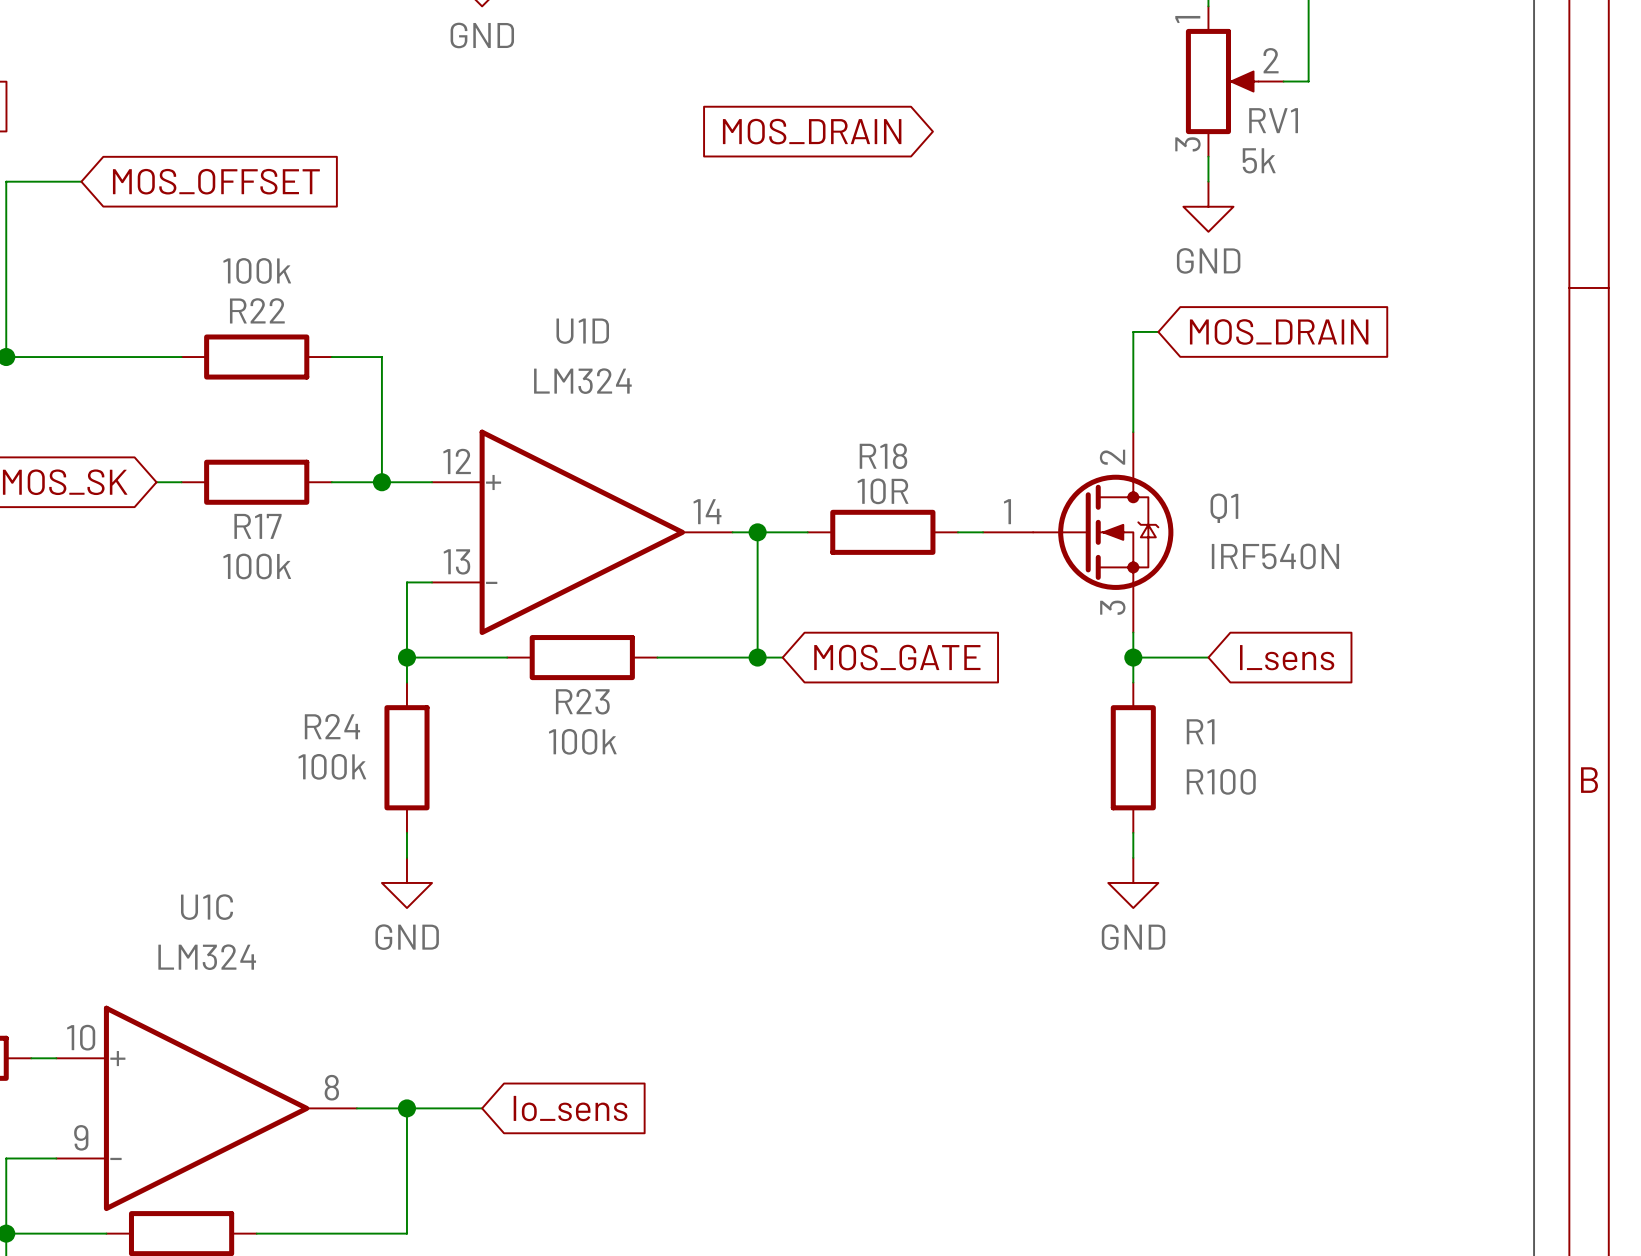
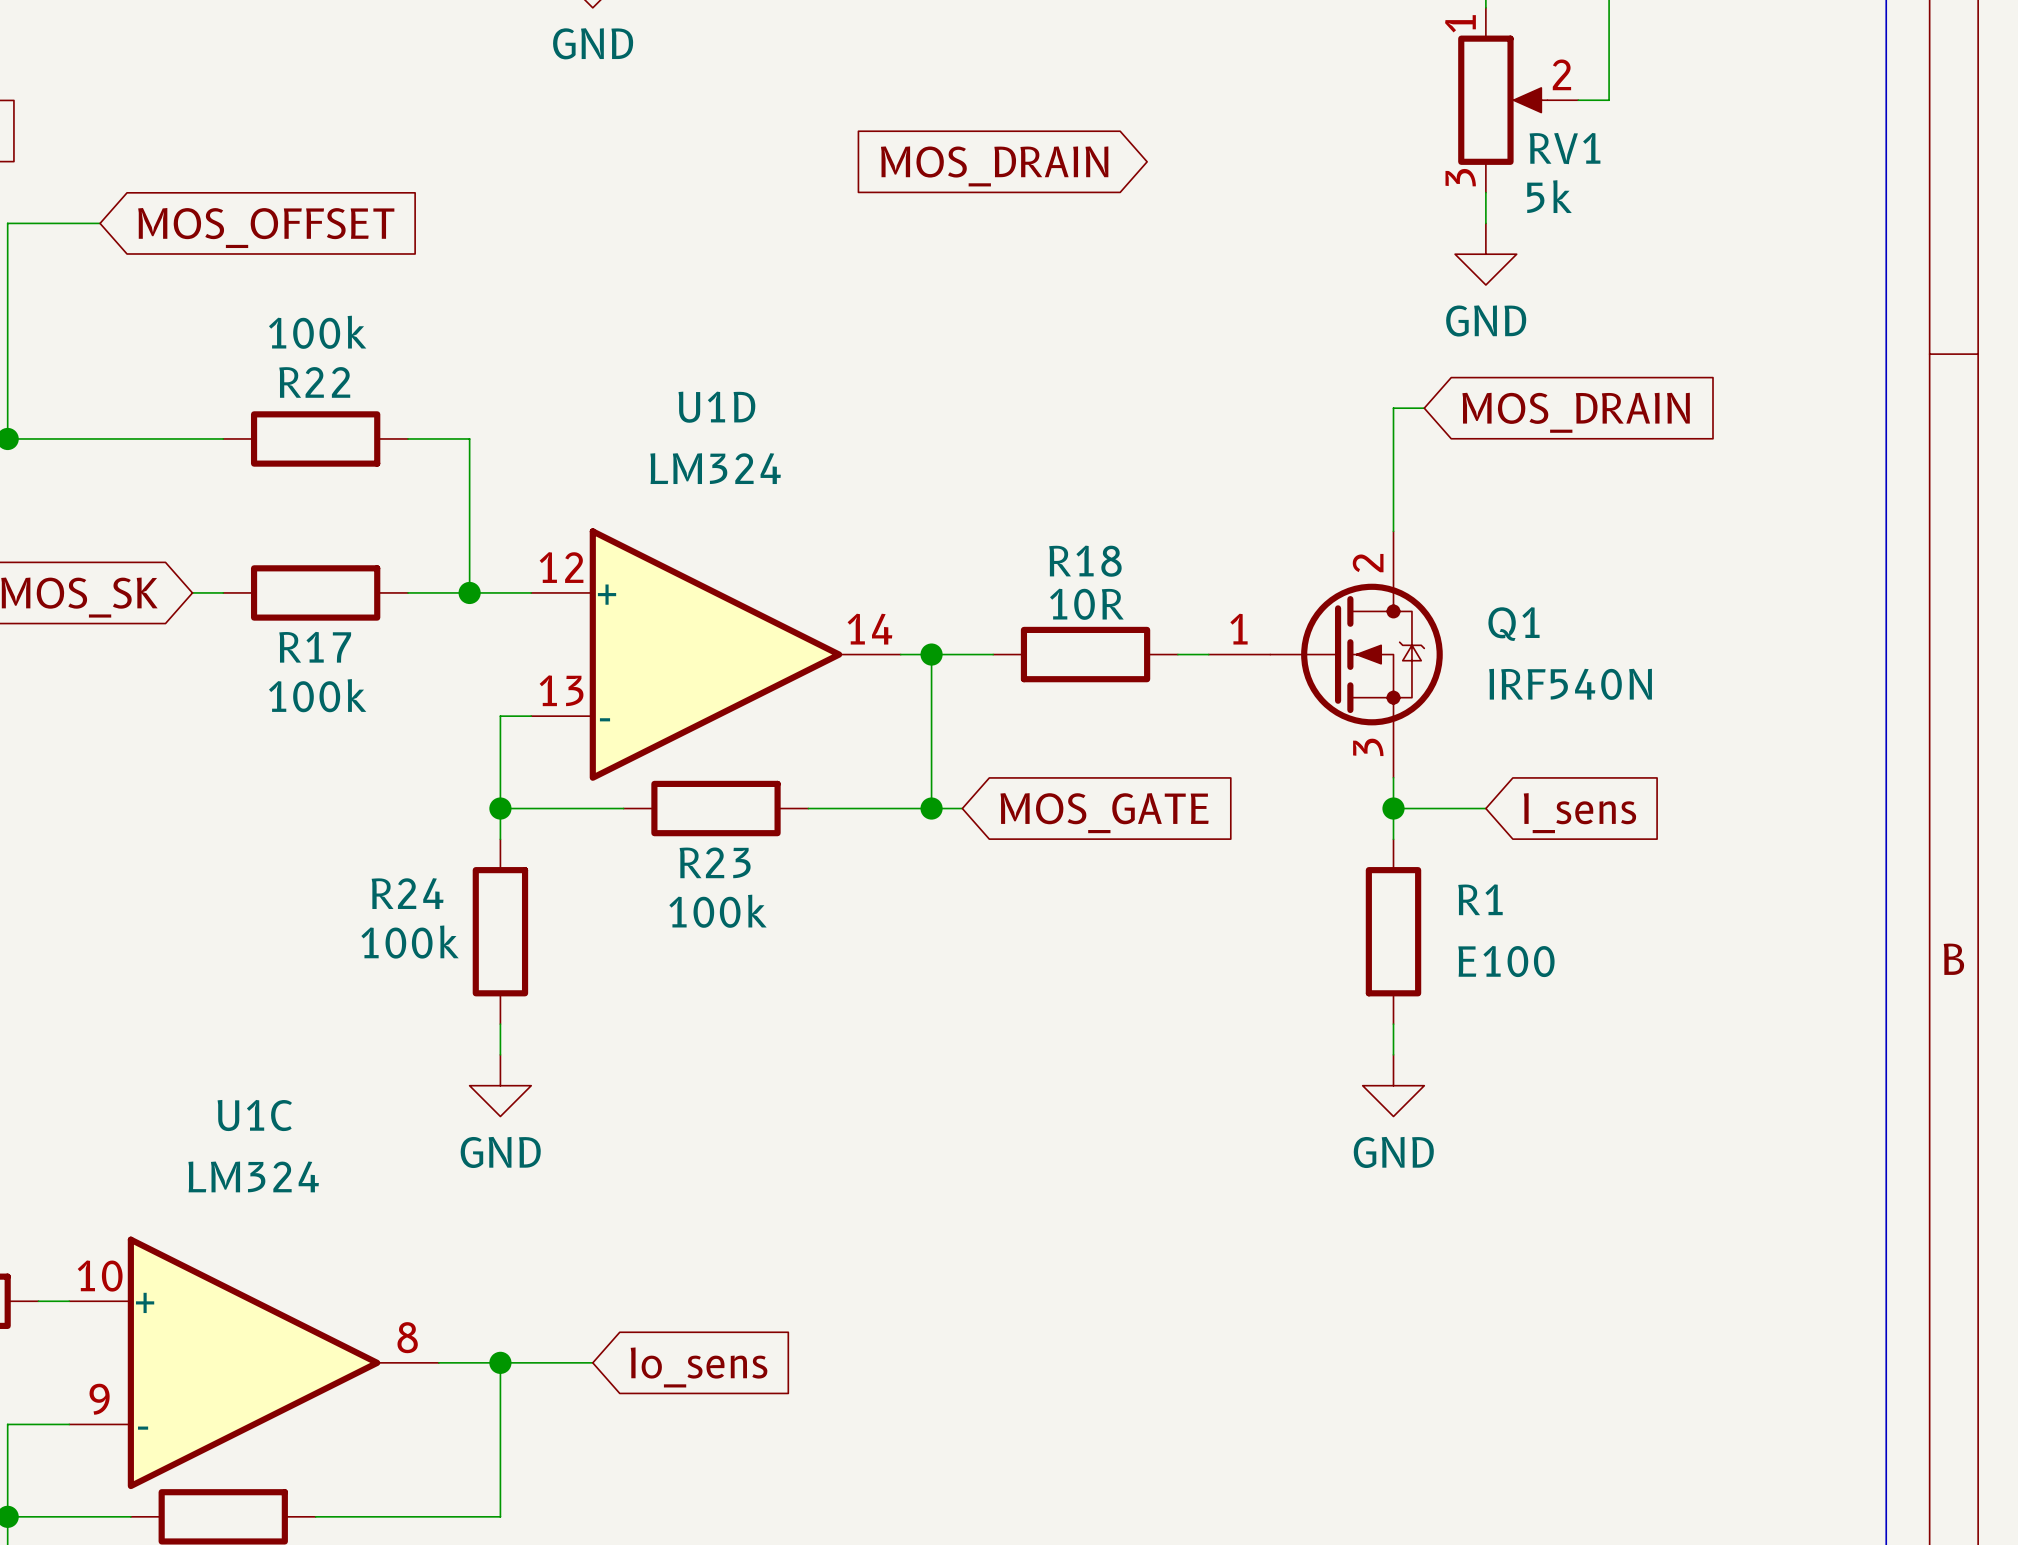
R1 value: R100 (1221, 781) -> E100 (1506, 961)

